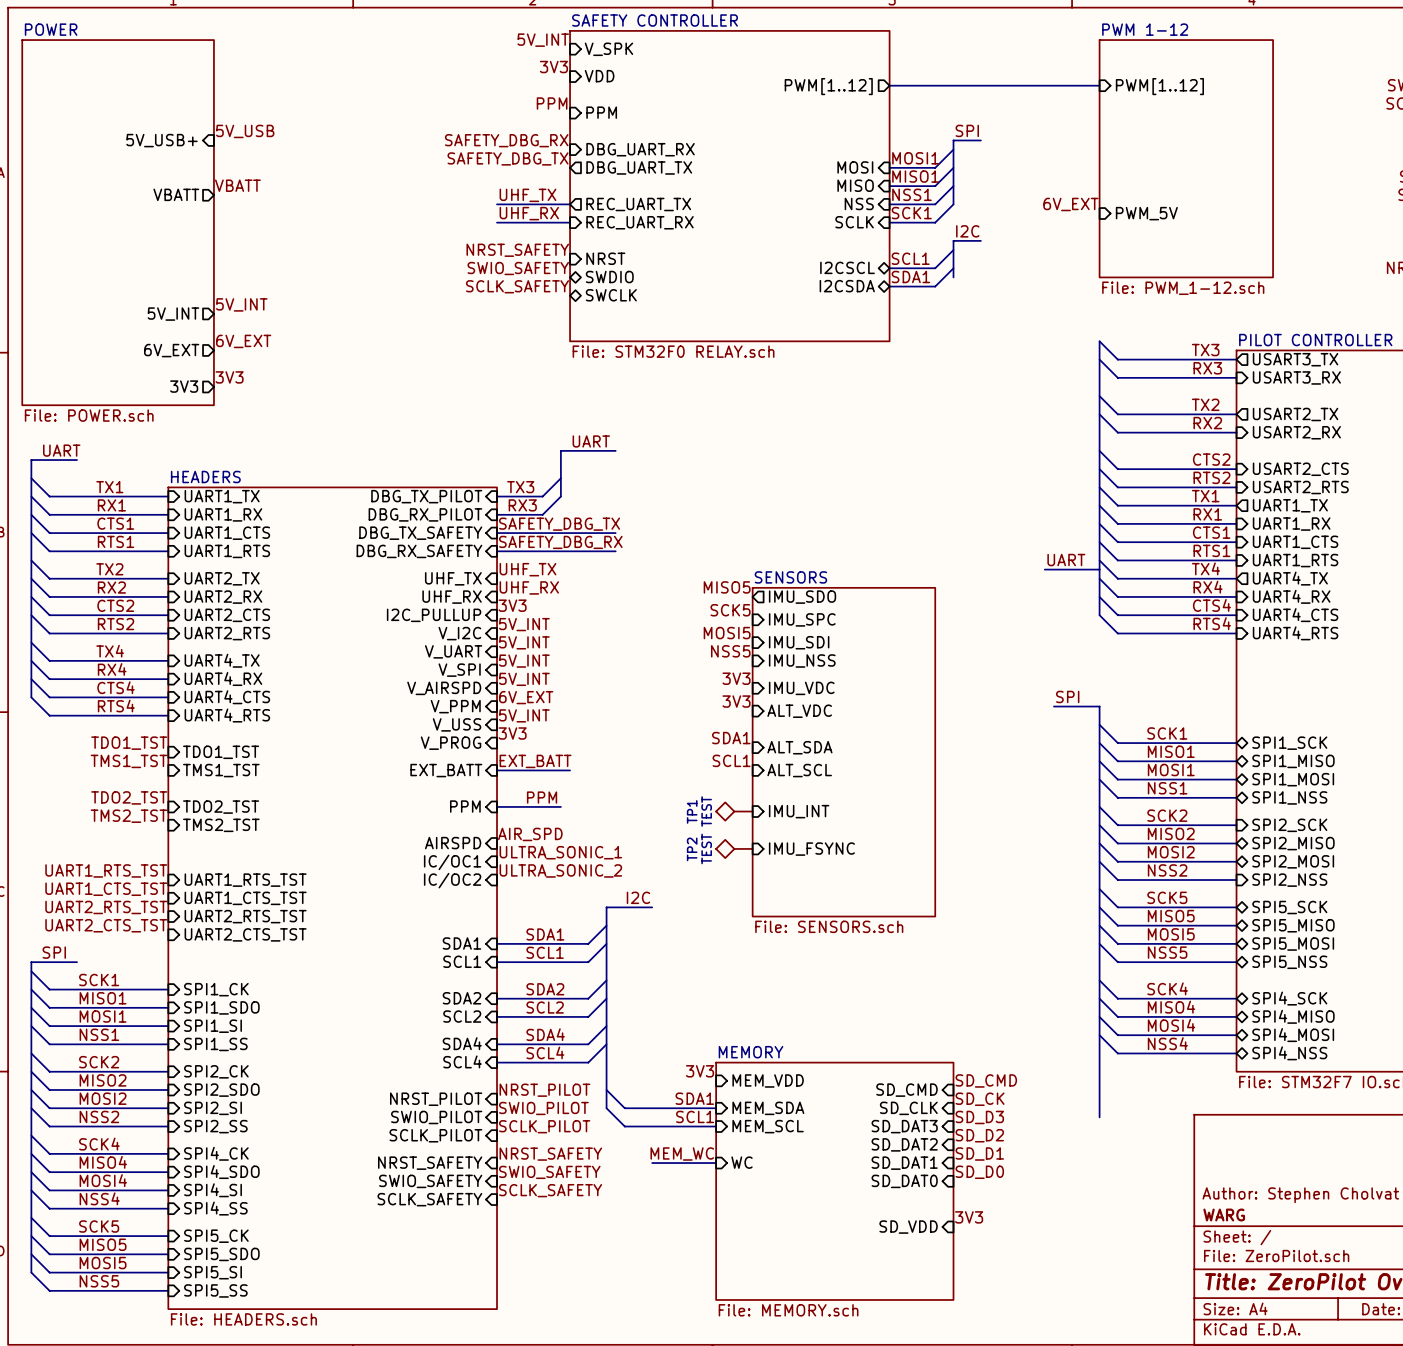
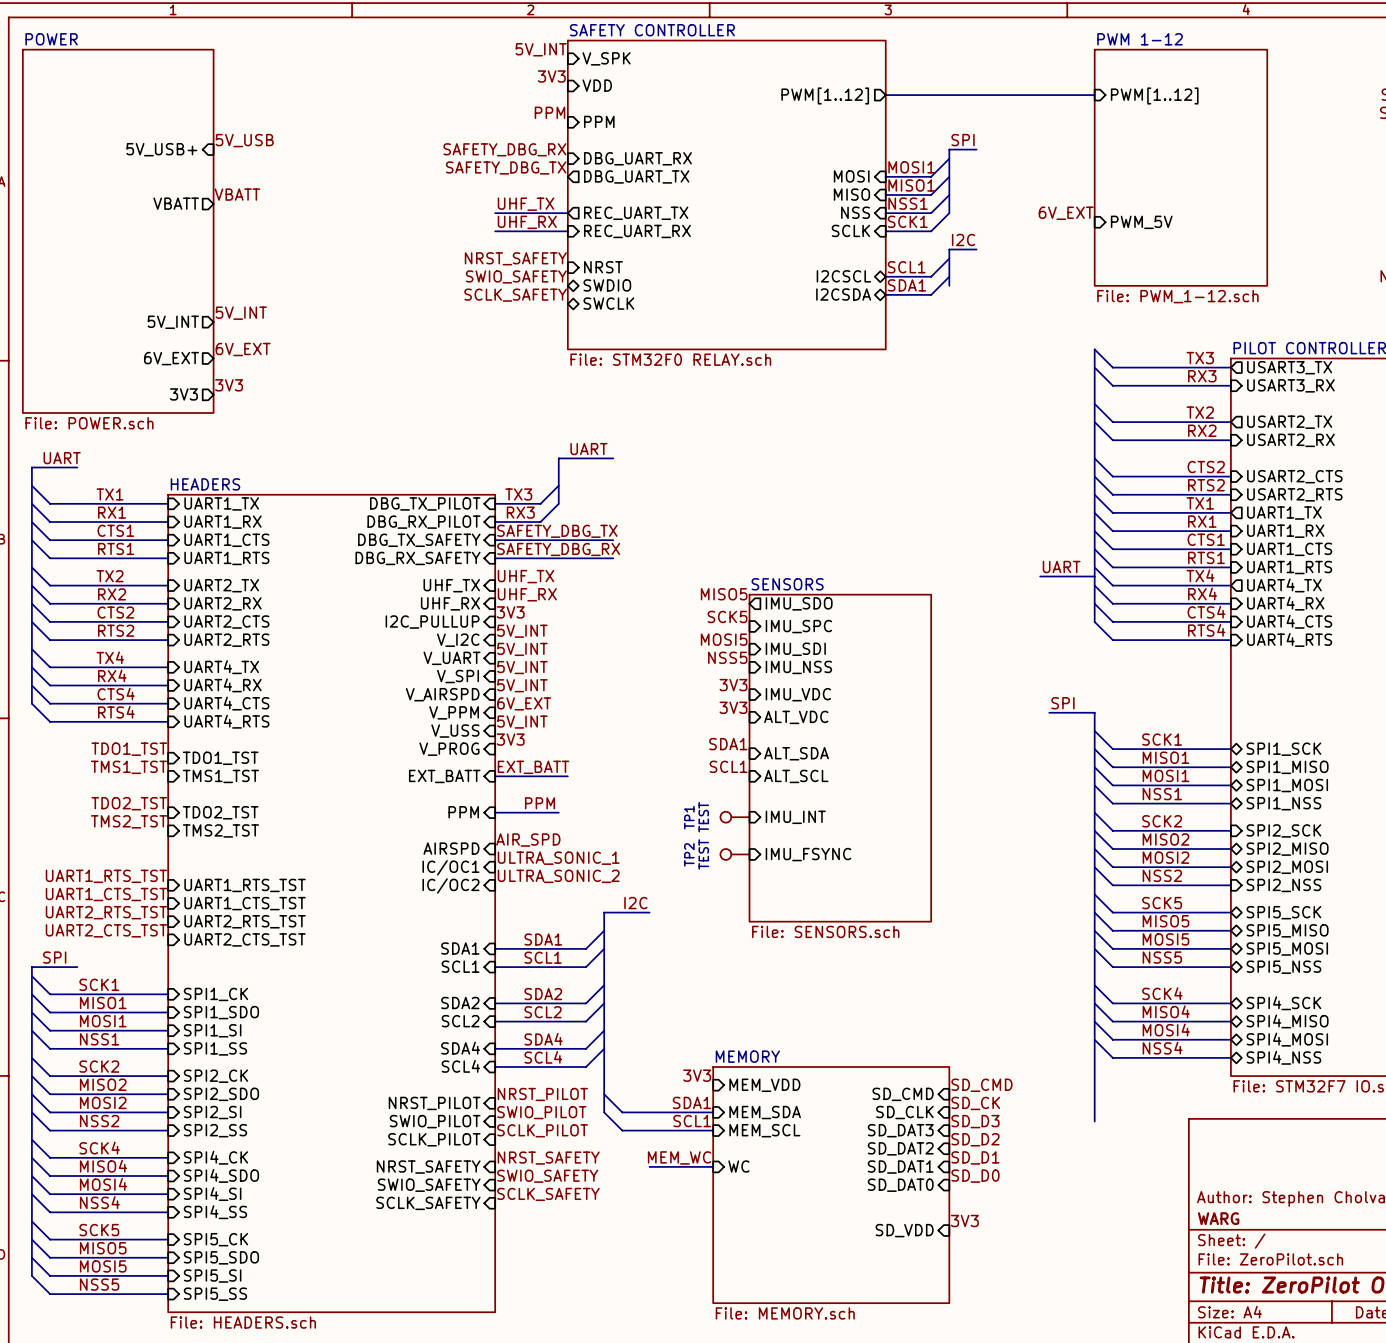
TP1 symbol: [716, 802, 753, 821] -> [720, 811, 750, 823]
TP2 symbol: [716, 839, 753, 859] -> [720, 849, 750, 860]

